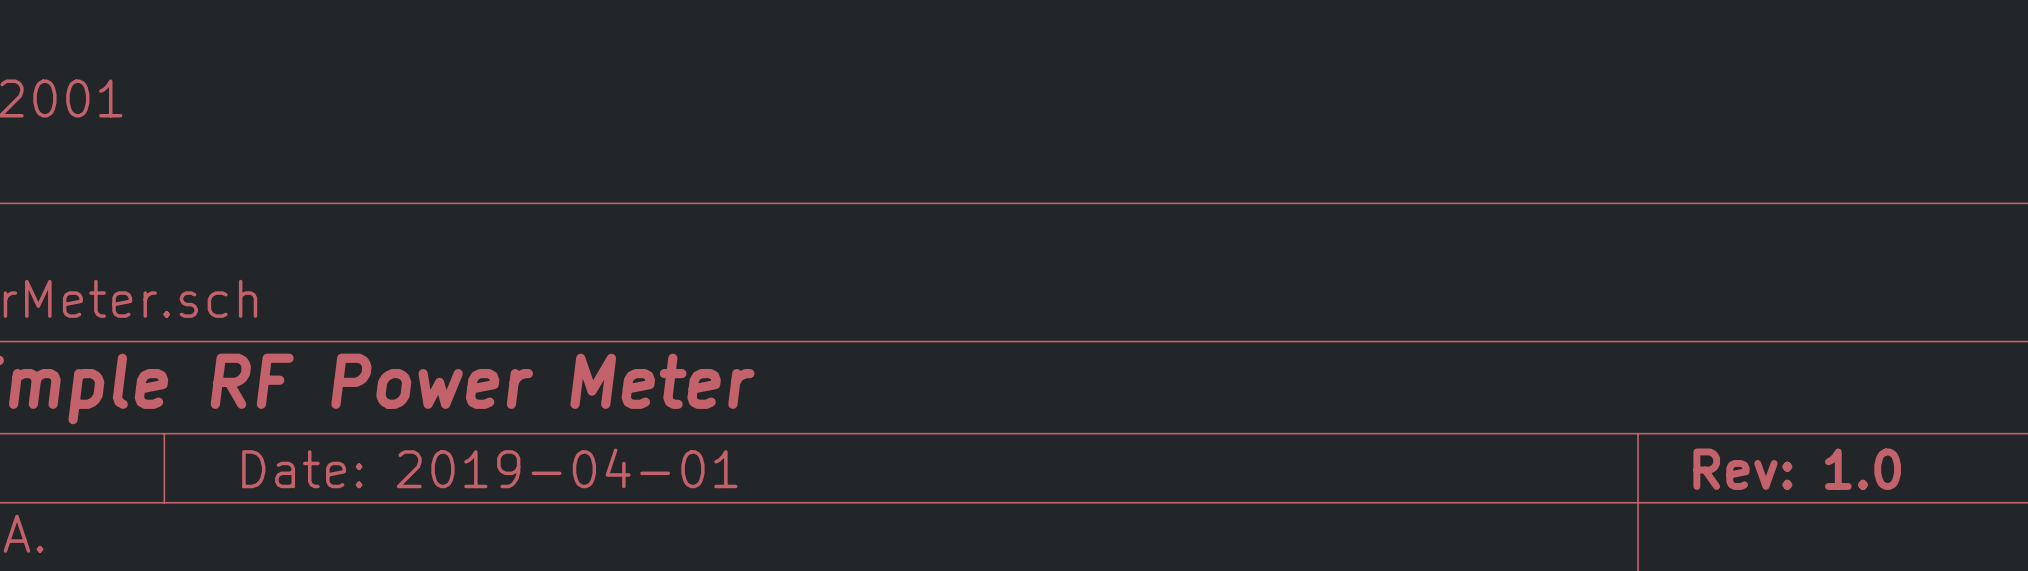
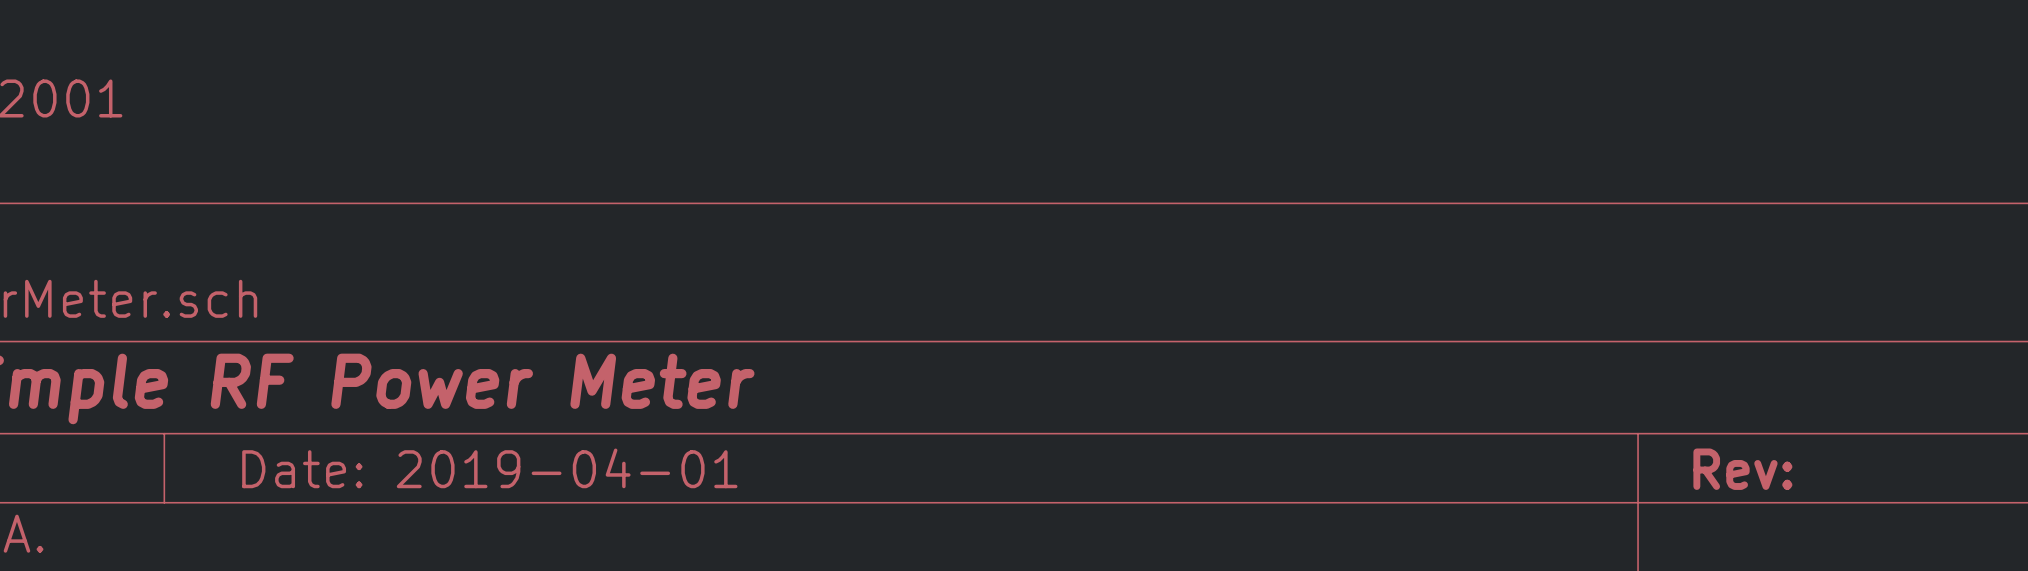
title block: Rev: 1.0 (1797, 469) -> Rev: (1742, 469)

